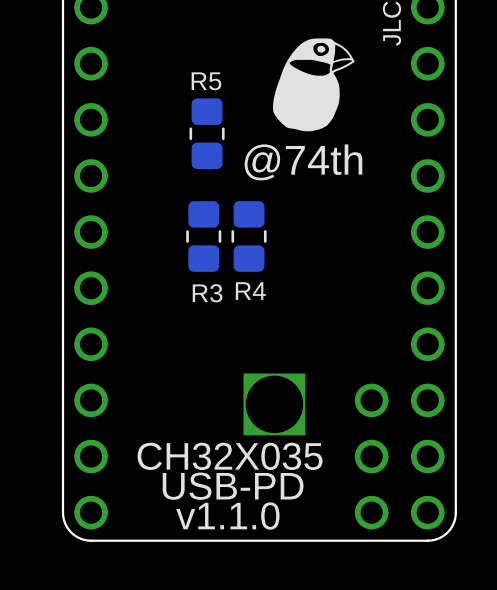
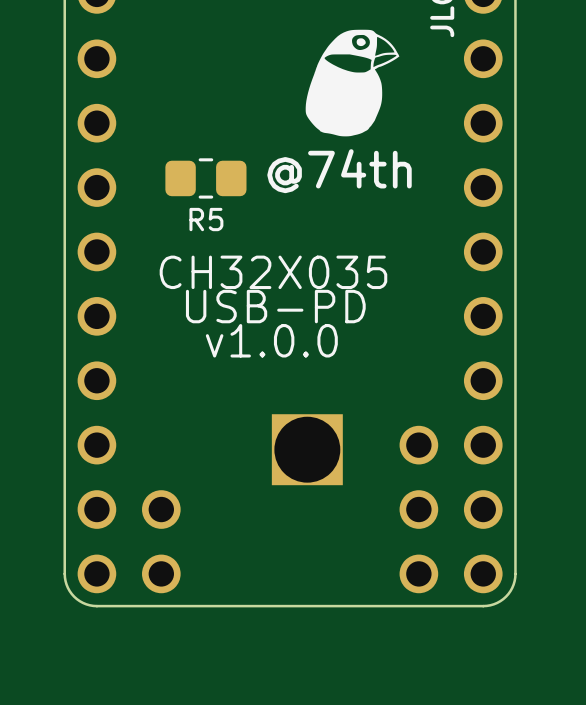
R5 name position: R5 (206, 81) -> R5 (206, 219)
R5 rotation: 0° (207, 133) -> 90° clockwise (205, 178)
R3: (203, 236) -> none
R4: (249, 236) -> none
text: none -> v1.0.0 (271, 340)
text position: CH32X035 (230, 456) -> CH32X035 (273, 272)
part: none -> (161, 541)
text position: USB-PD (233, 486) -> USB-PD (275, 306)
text: v1.1.0 (227, 516) -> none

